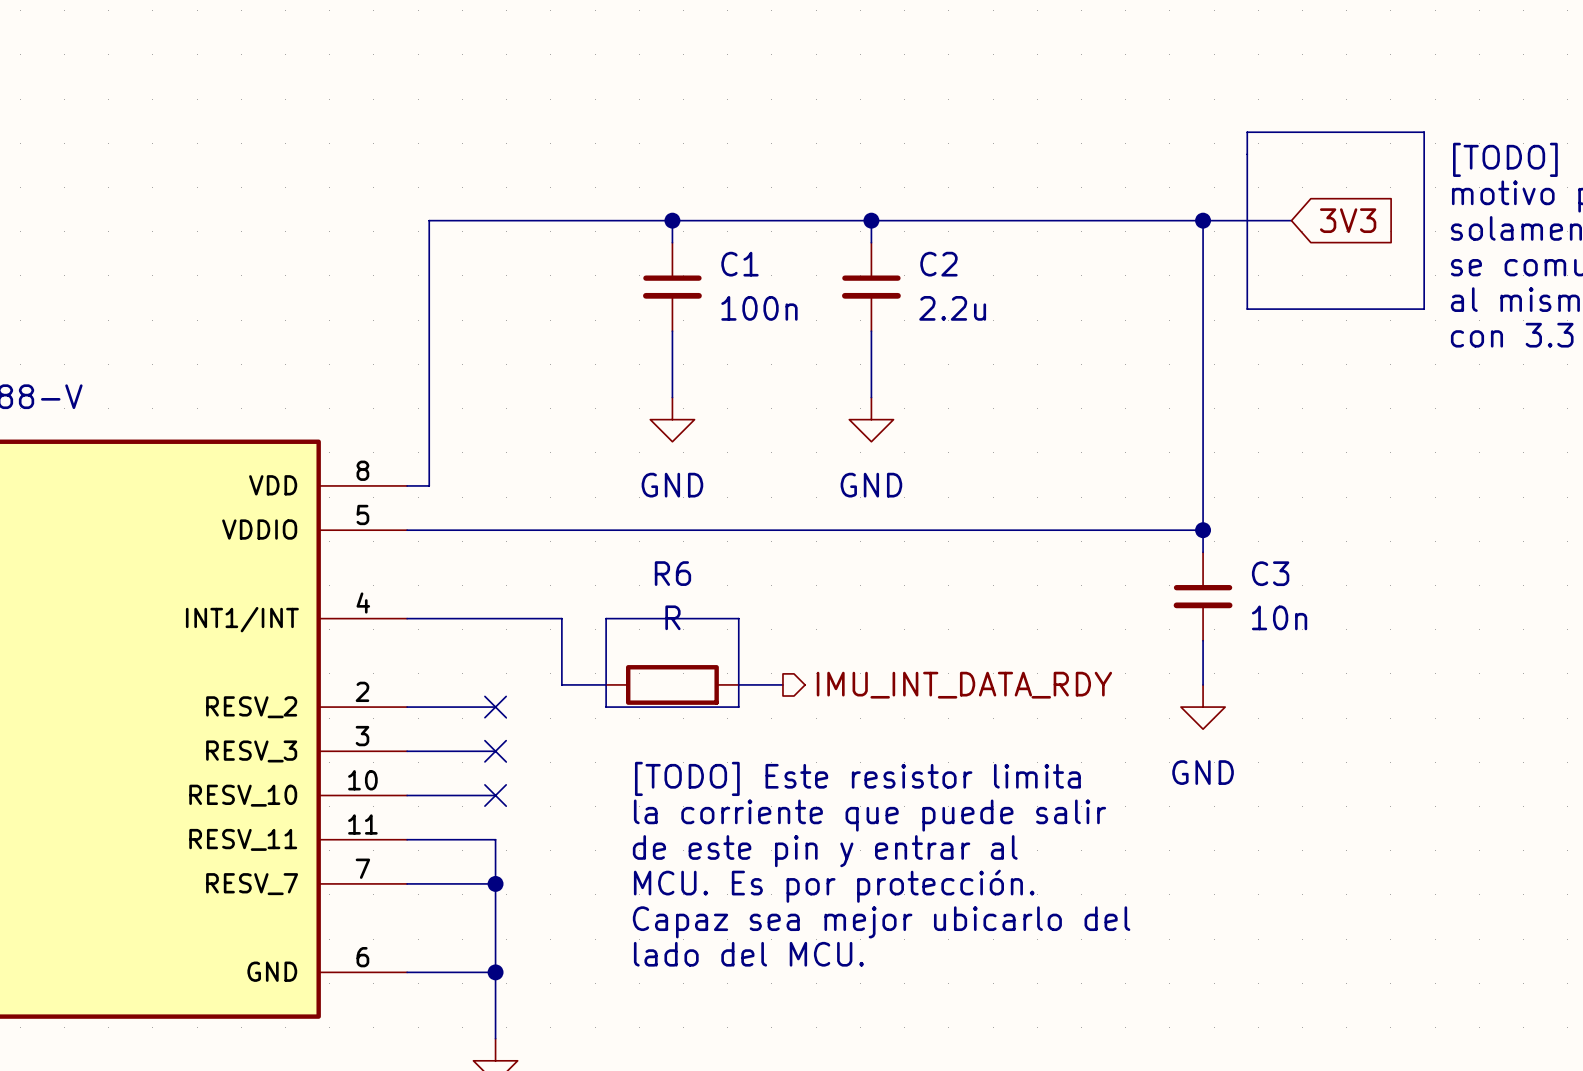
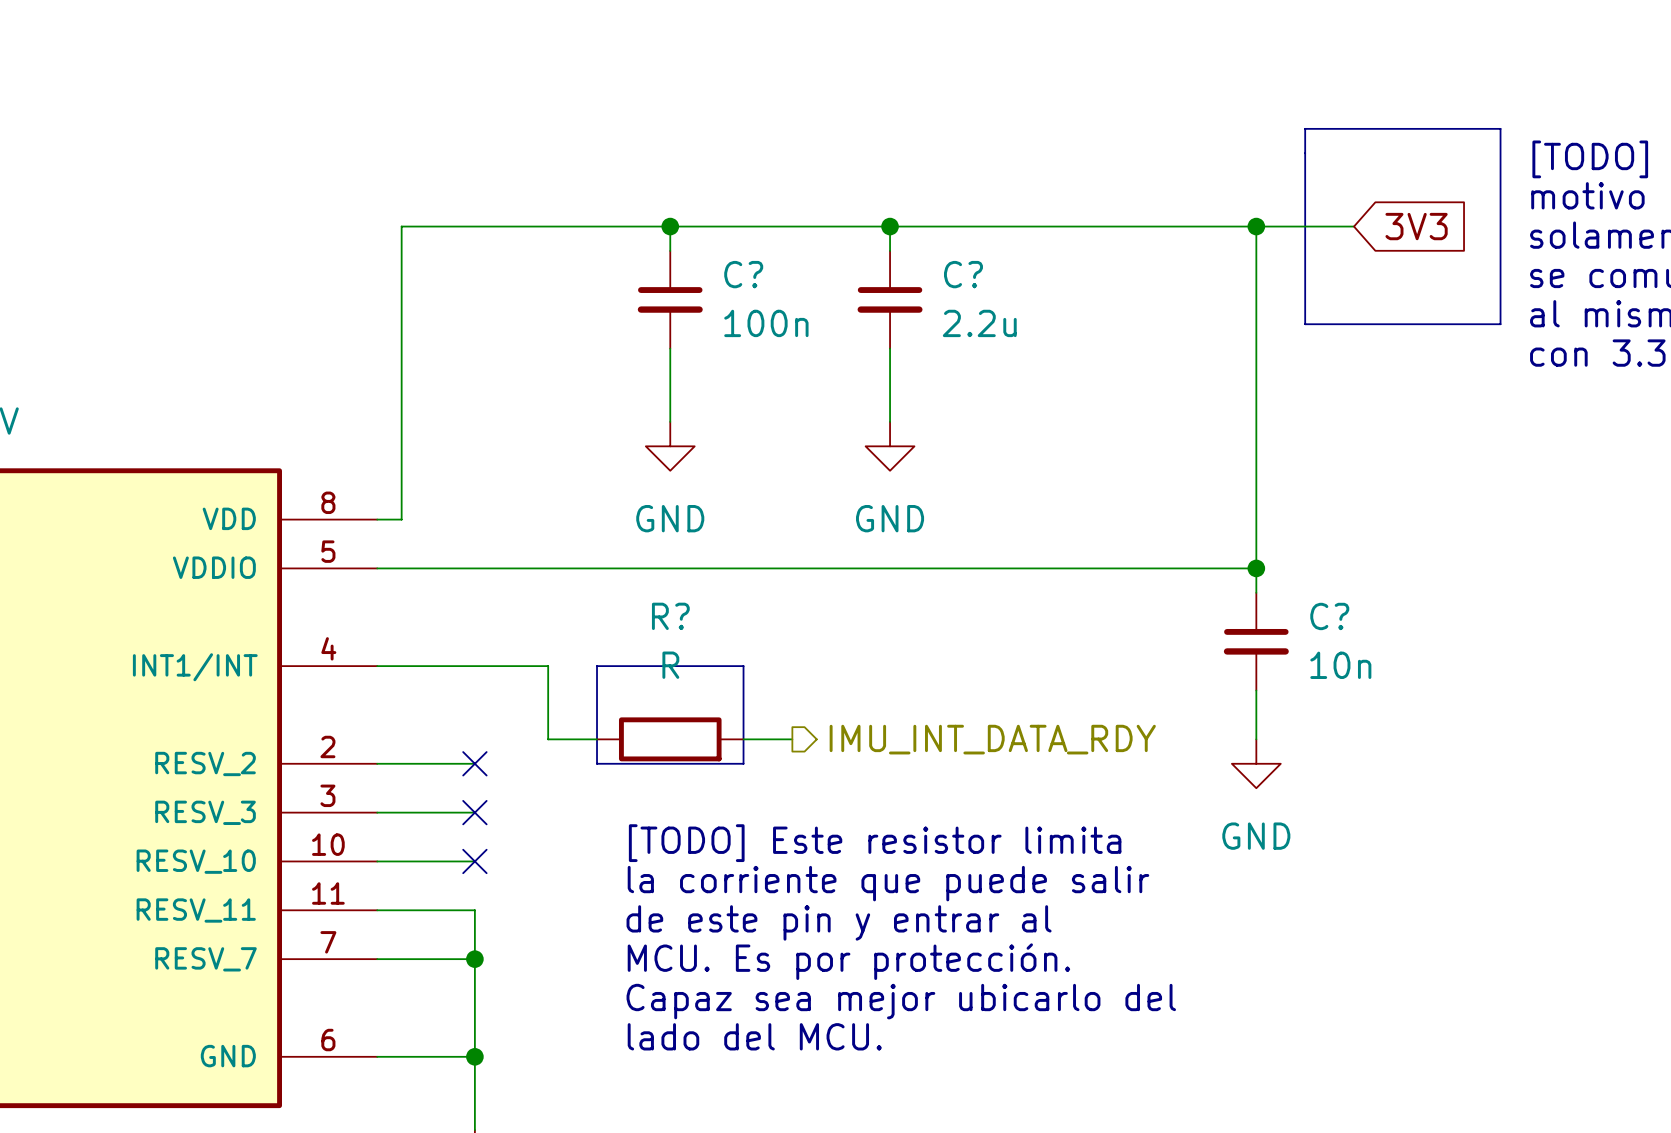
C1 name: C1 (739, 264) -> C? (743, 274)
C2 name: C2 (938, 264) -> C? (963, 274)
R6 name: R6 (672, 573) -> R? (670, 616)
C3 name: C3 (1270, 573) -> C? (1329, 616)

